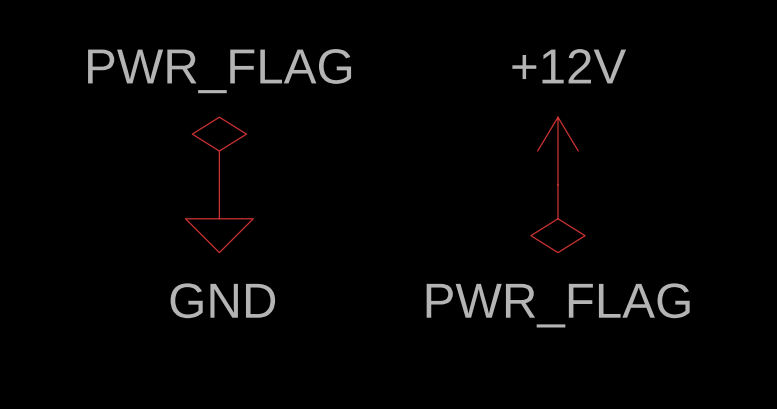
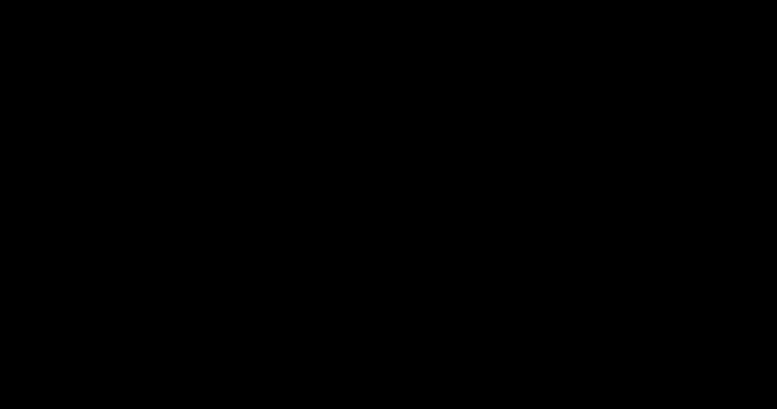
power symbol: PWR_FLAG (219, 151) -> none
power symbol: +12V (557, 151) -> none
power symbol: GND (219, 218) -> none
power symbol: PWR_FLAG (557, 218) -> none

